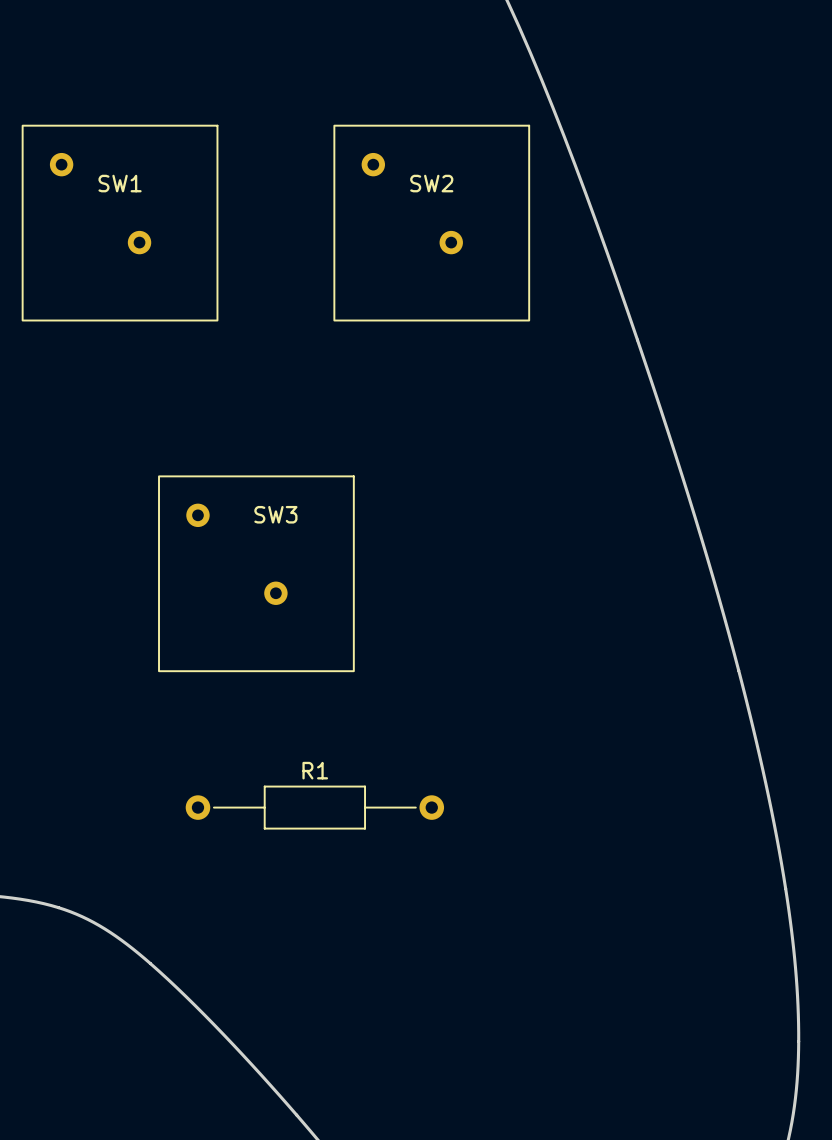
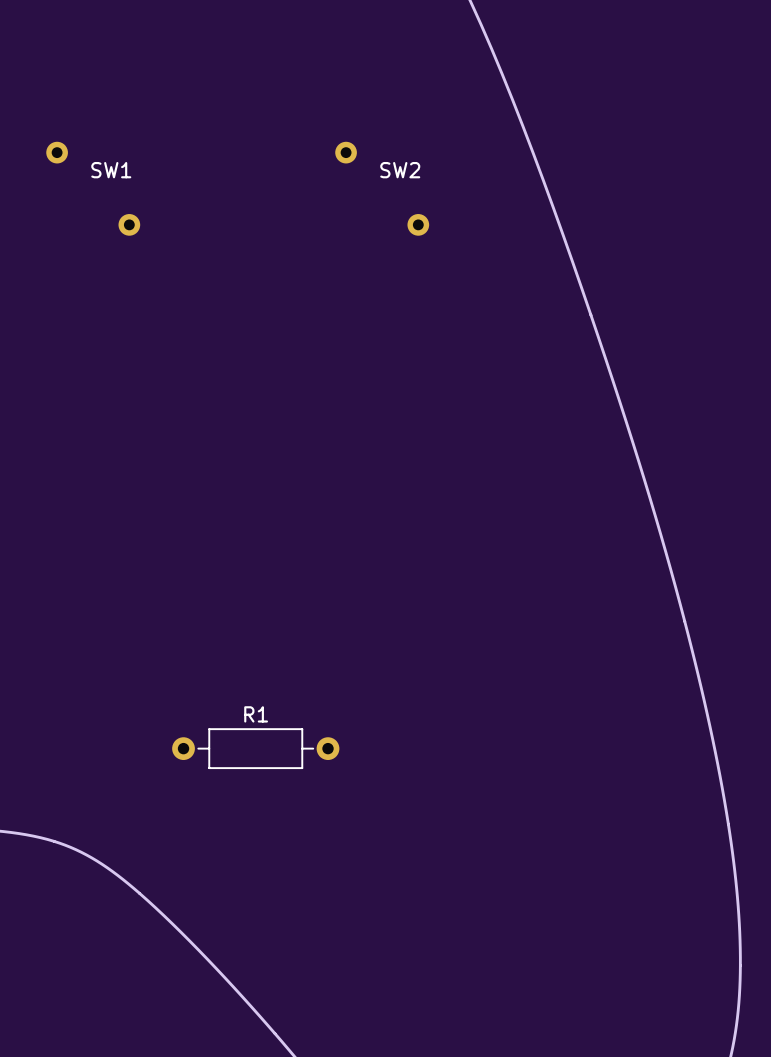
SW1 footprint: [21, 124, 219, 322] -> [46, 141, 141, 236]
SW2 footprint: [333, 124, 531, 322] -> [335, 141, 430, 236]
SW3: (256, 573) -> none
R1 footprint: [185, 785, 445, 830] -> [172, 728, 340, 769]

